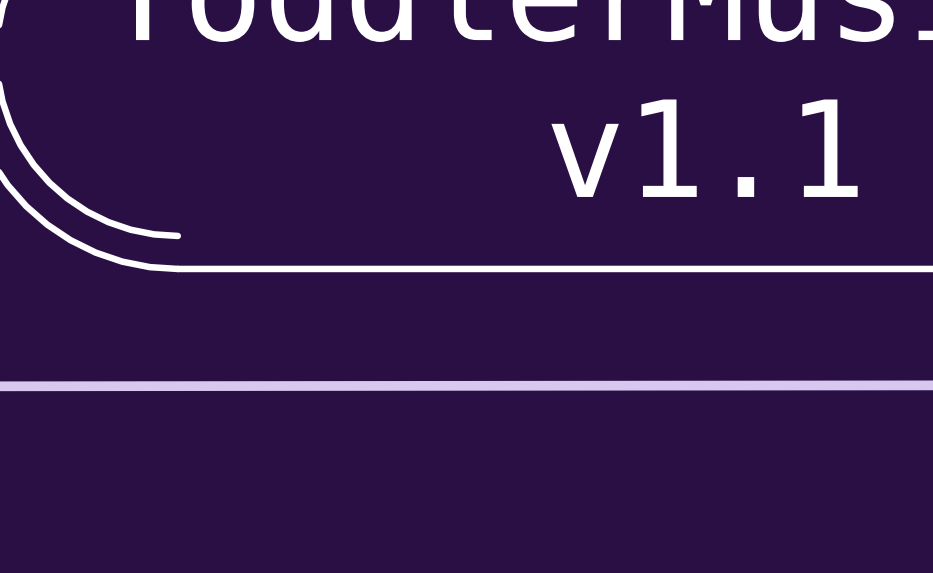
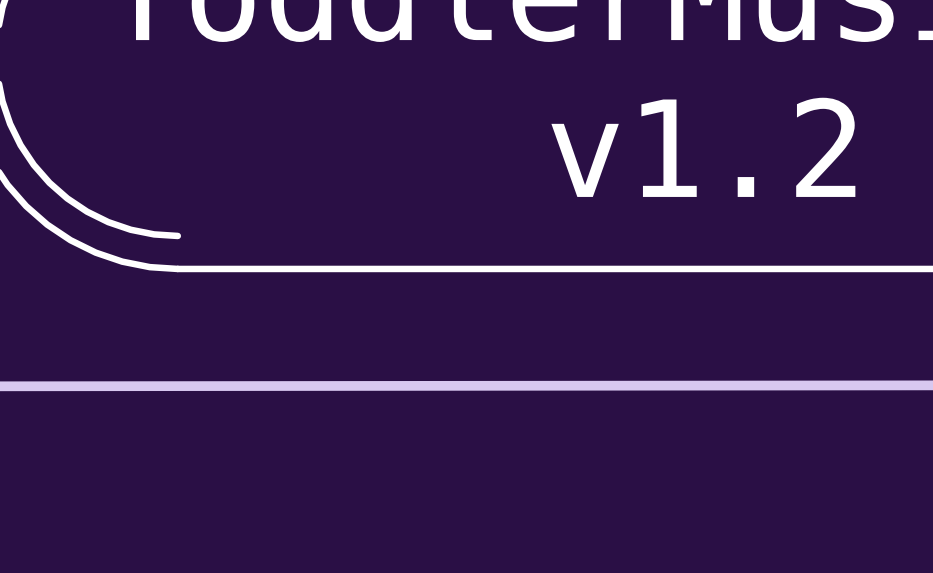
text: v1.1 (704, 148) -> v1.2 (703, 147)

